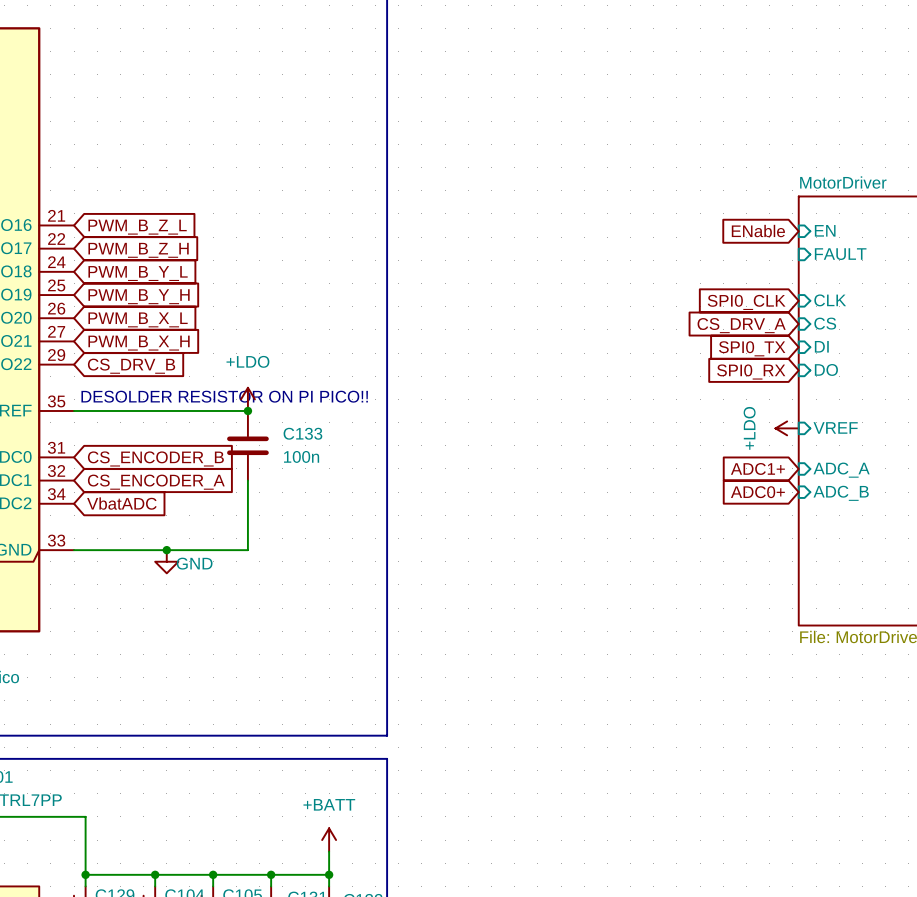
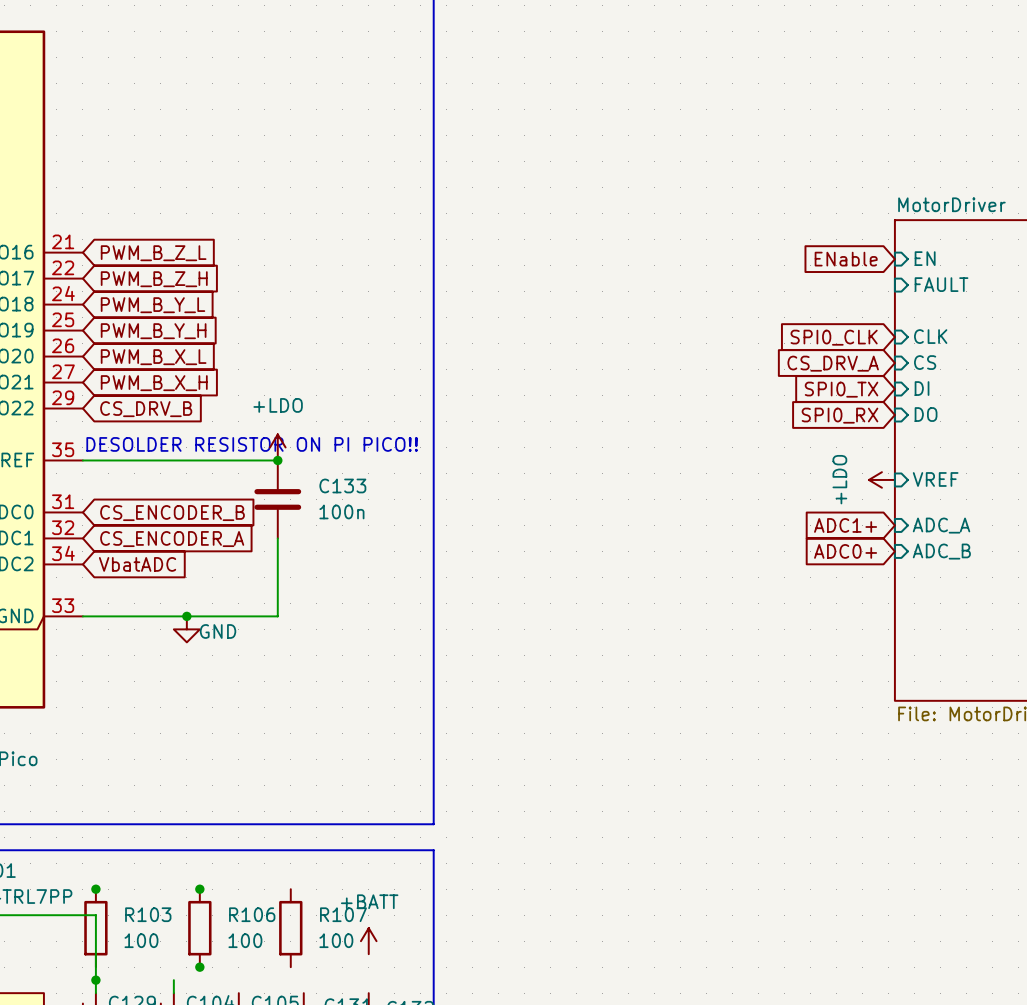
junction: none -> (95, 889)
junction: none -> (199, 889)
R103: none -> 100 (95, 928)
R106: none -> 100 (199, 928)
R107: none -> 100 (290, 928)
wire: (329, 851) (329, 886) -> none
junction: none -> (199, 967)
wire: (85, 874) (329, 874) -> none
junction: (155, 874) -> none
wire: (213, 874) (213, 886) -> none
junction: (213, 874) -> none
wire: (271, 874) (271, 886) -> none
junction: (271, 874) -> none
junction: (329, 874) -> none

